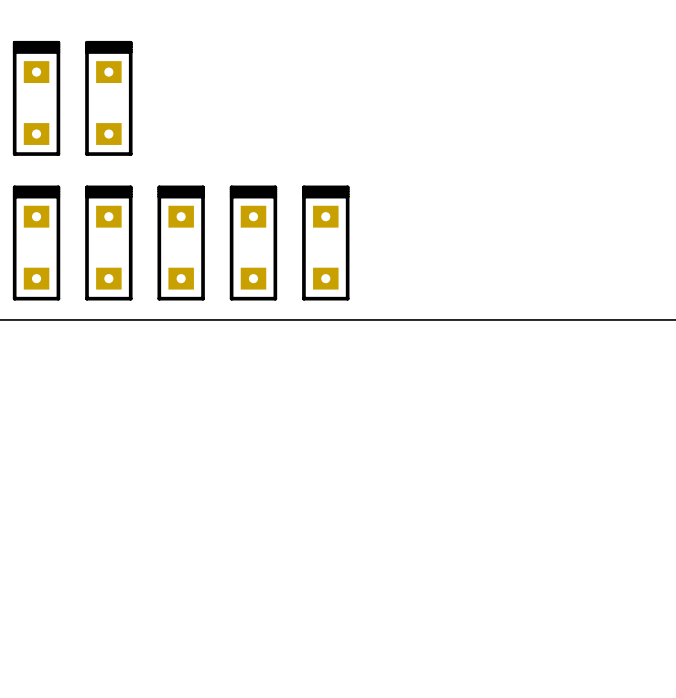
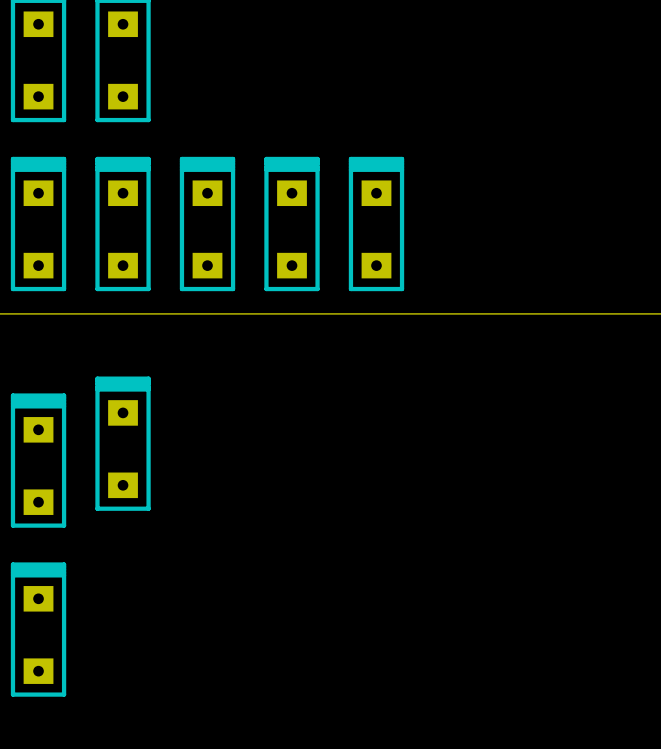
part: none -> (123, 443)
part: none -> (38, 460)
part: none -> (38, 629)

